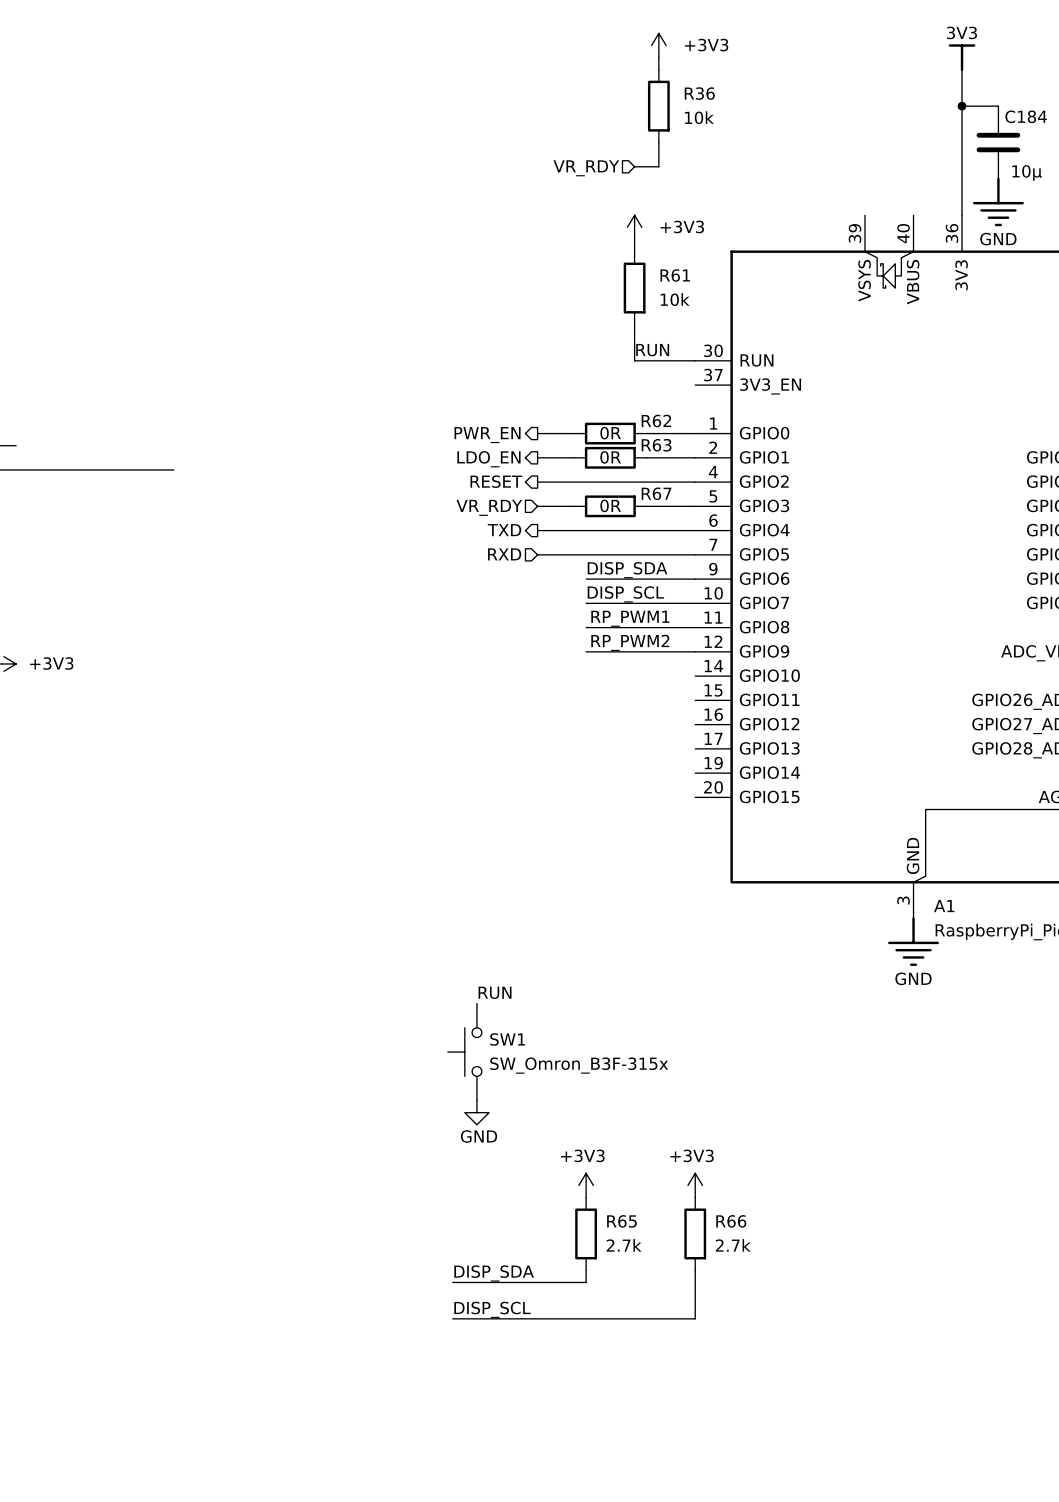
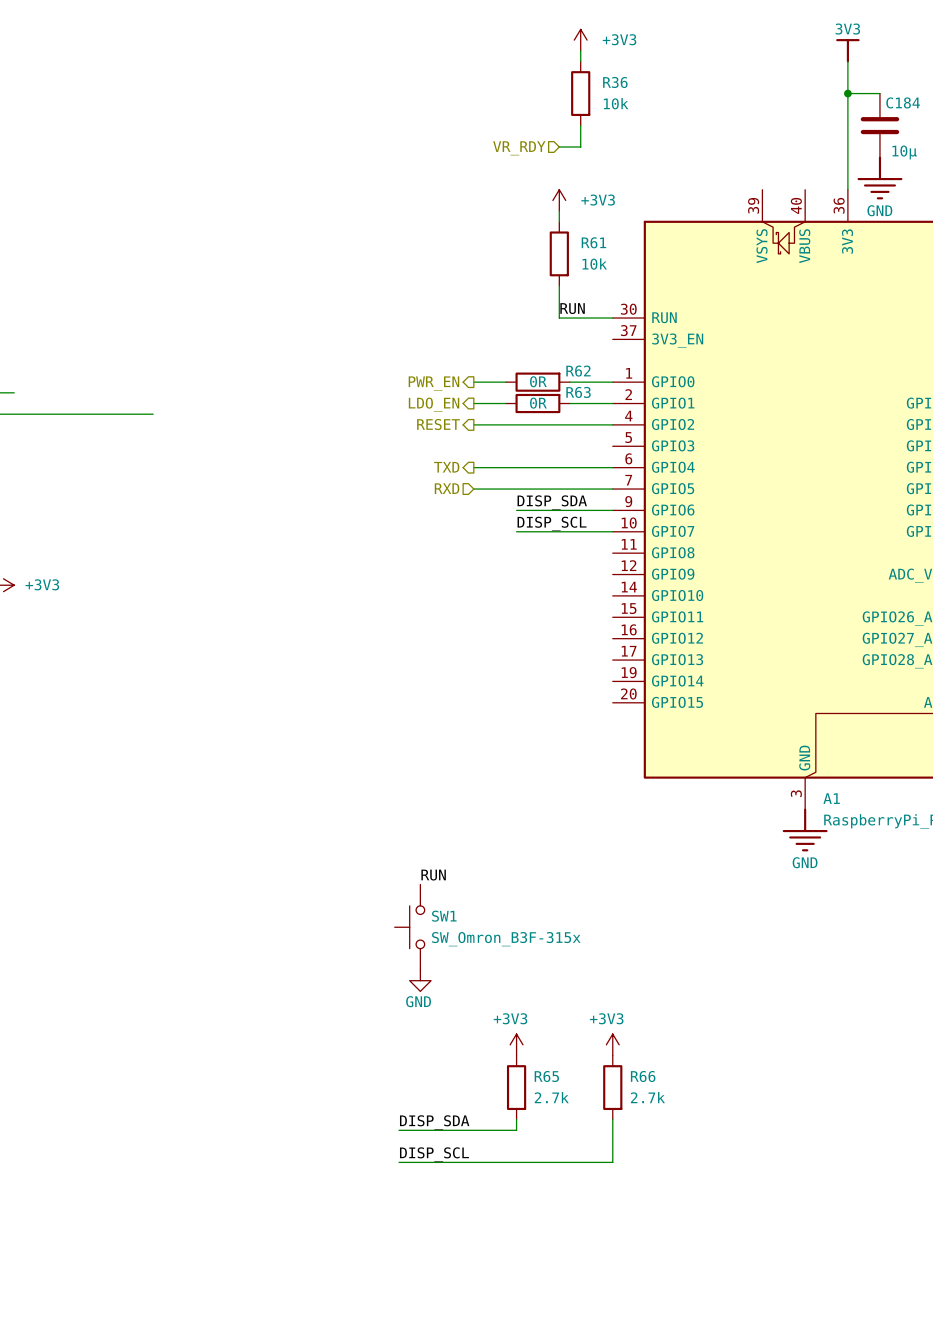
wire: (537, 506) (573, 506) -> none
R67: 0R (610, 506) -> none
wire: (646, 506) (695, 506) -> none
hierarchical label: VR_RDY (489, 507) -> none
label: RP_PWM1 (630, 618) -> none
wire: (586, 627) (695, 627) -> none
label: RP_PWM2 (630, 642) -> none
wire: (586, 651) (695, 651) -> none

